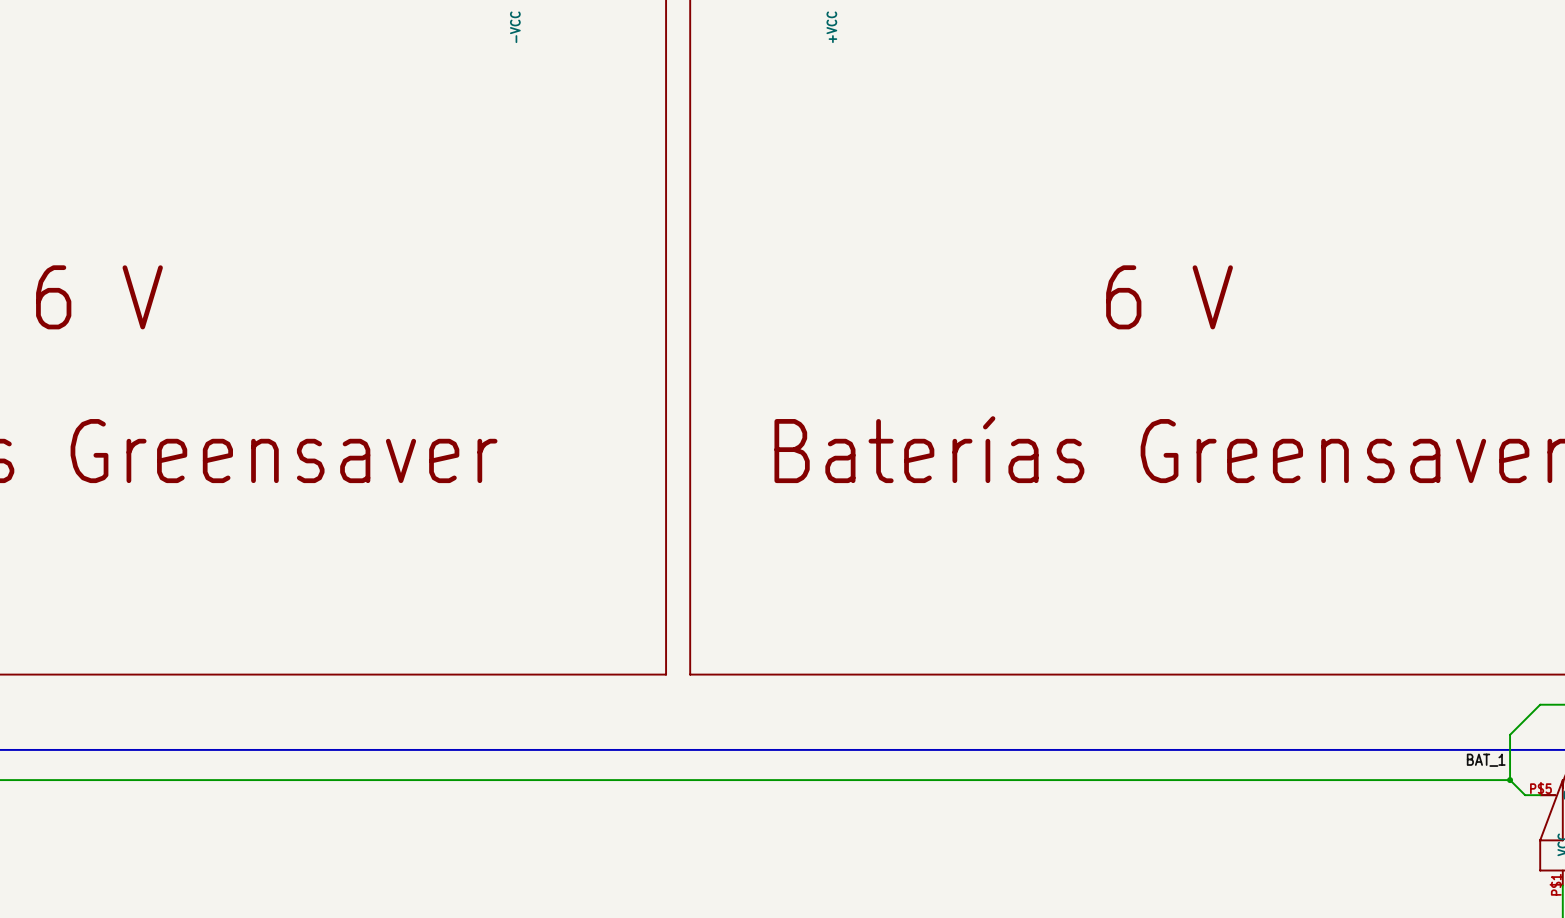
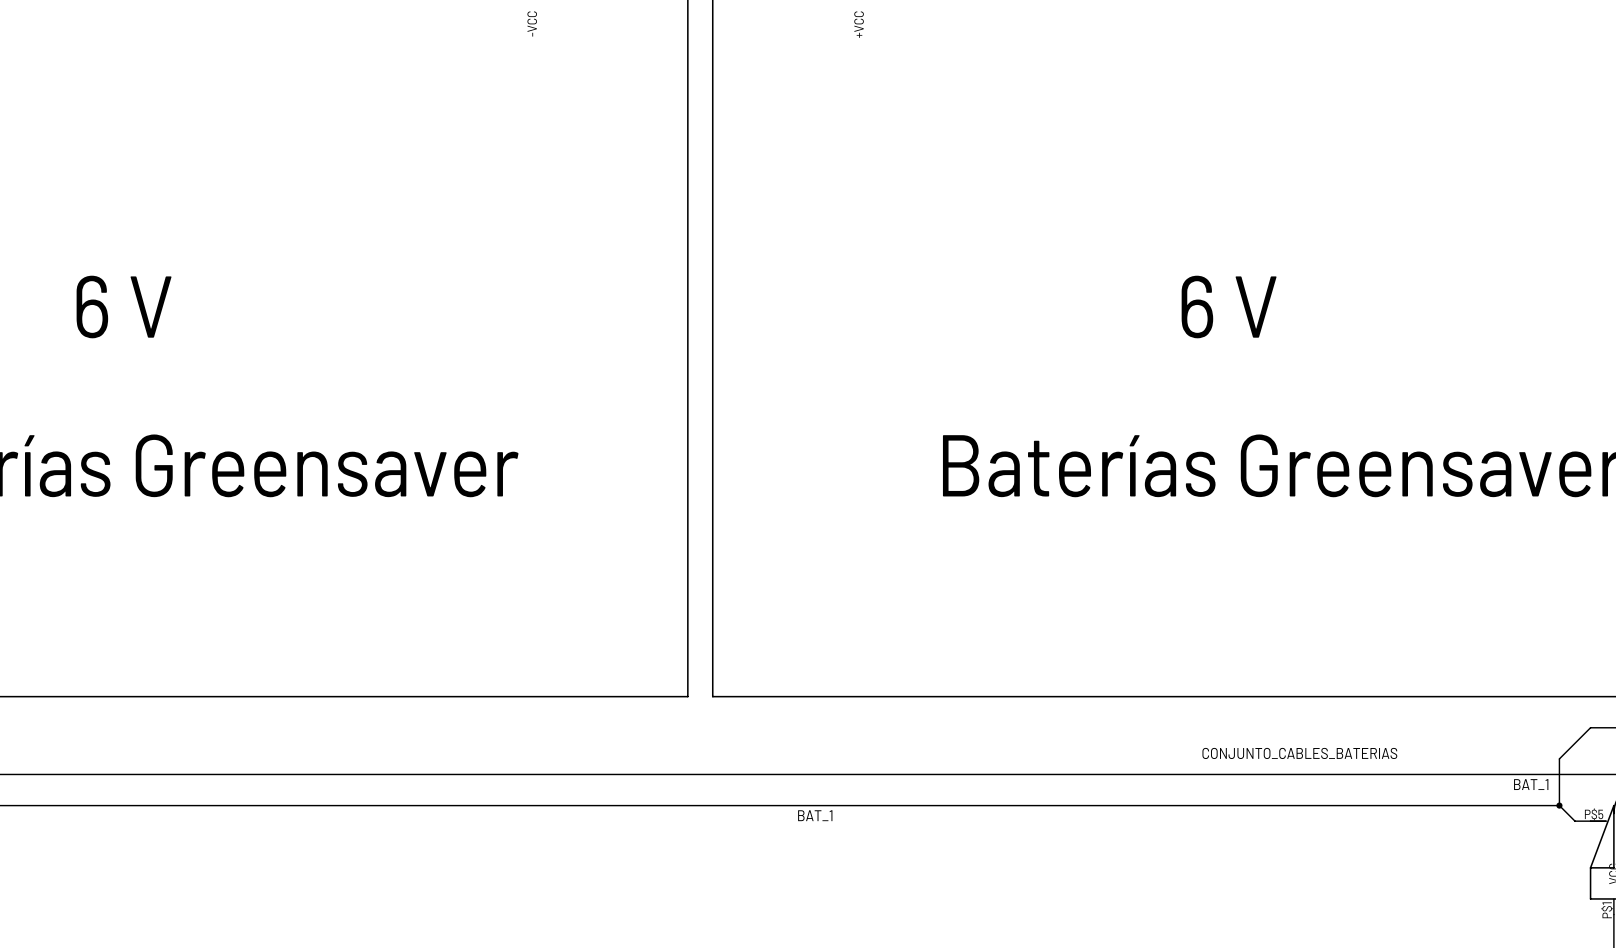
label: none -> CONJUNTO_CABLES_BATERIAS (1299, 753)
label: none -> BAT_1 (815, 815)

